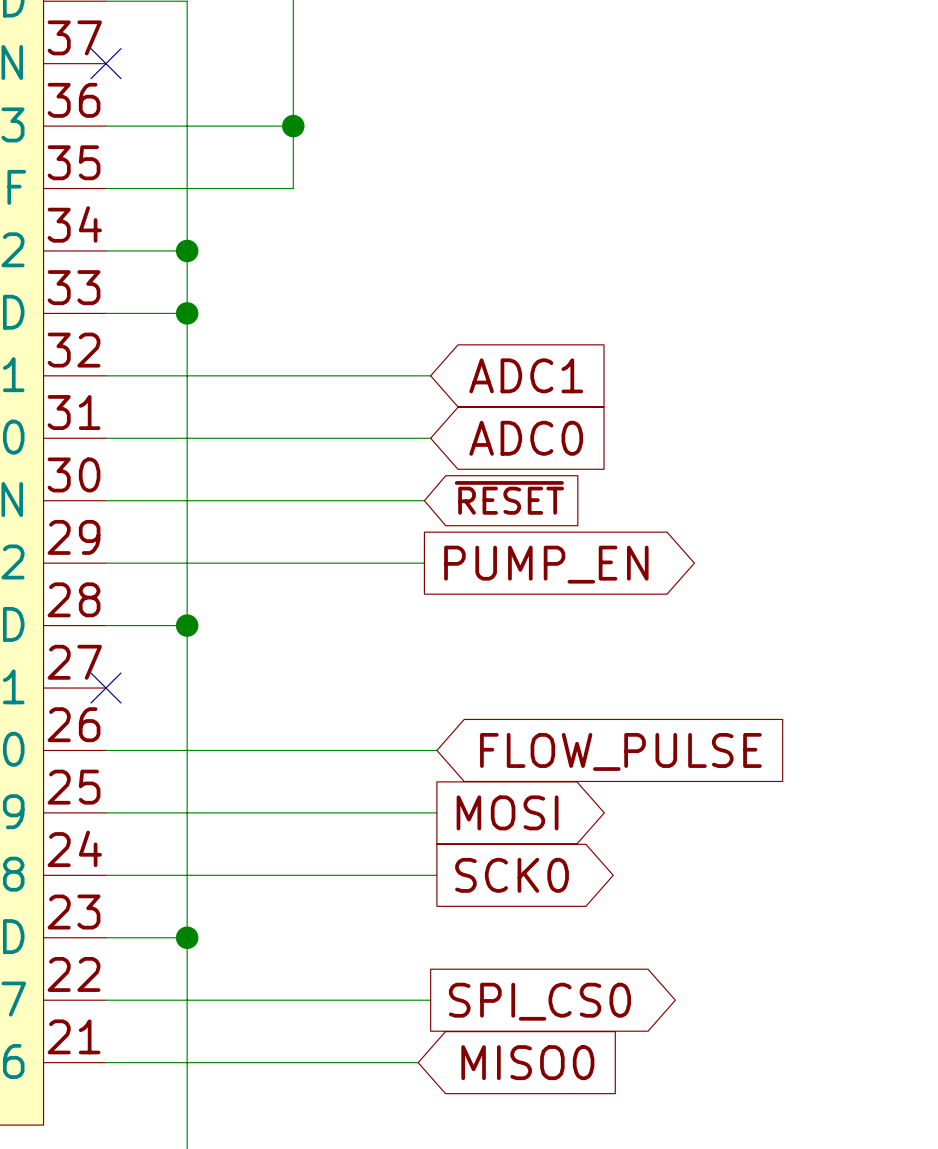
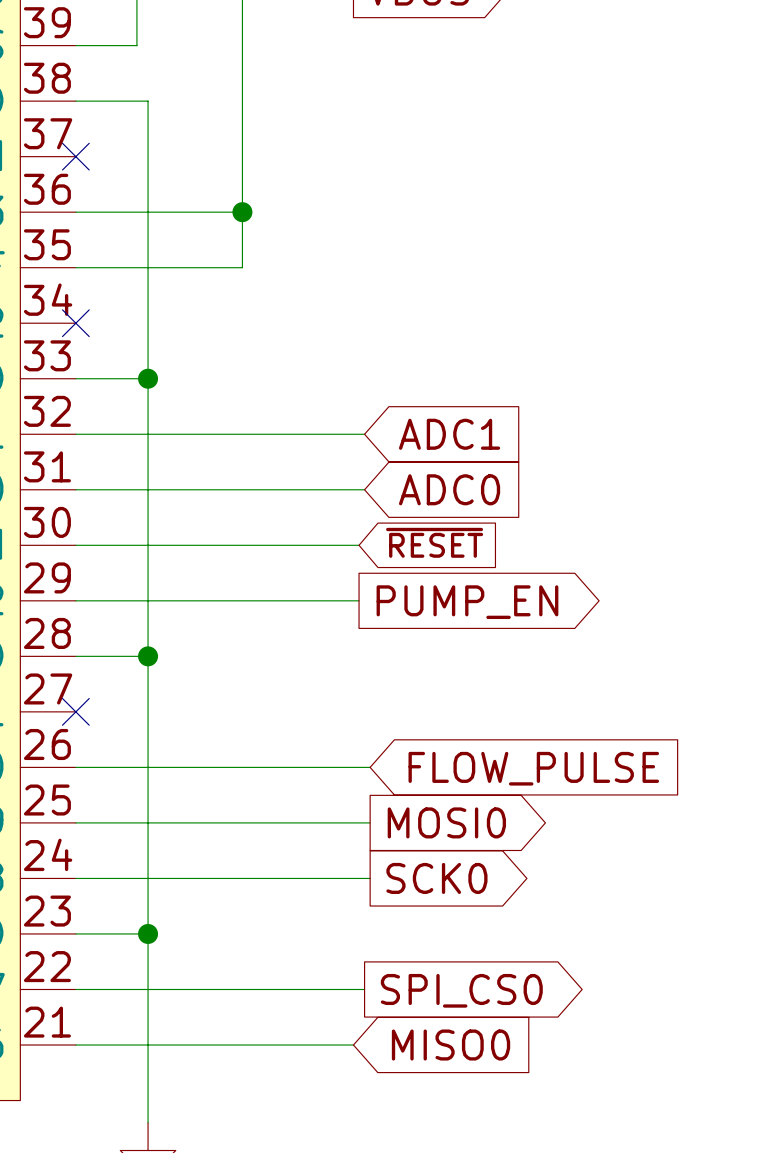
wire: (105, 250) (187, 250) -> none
no-connect mark: none -> (75, 323)
junction: (187, 250) -> none
global label: MOSI (507, 812) -> MOSI0 (446, 822)

